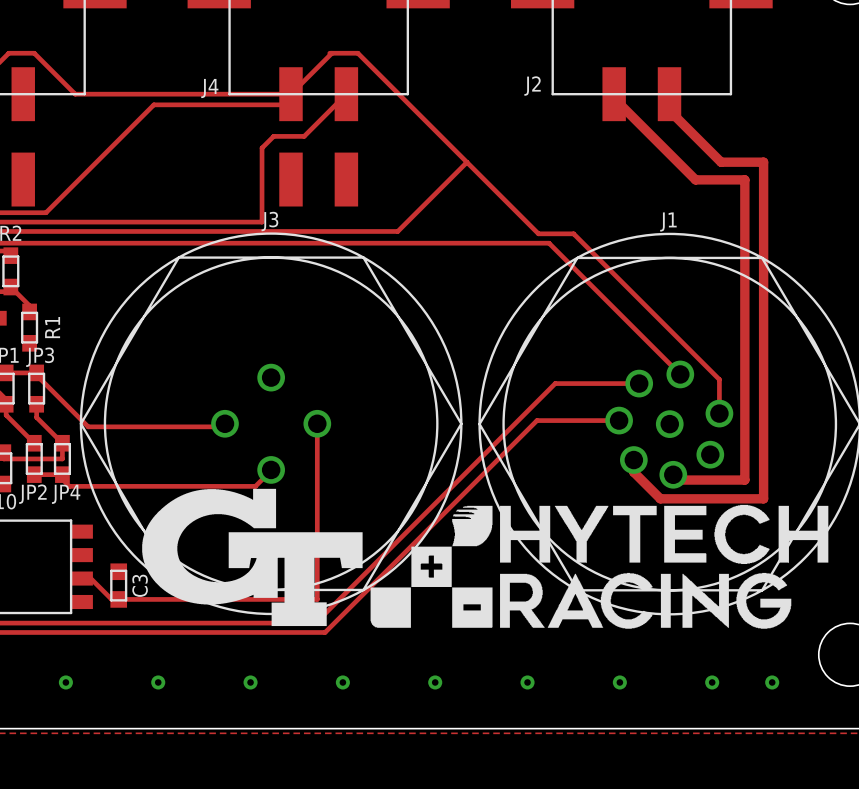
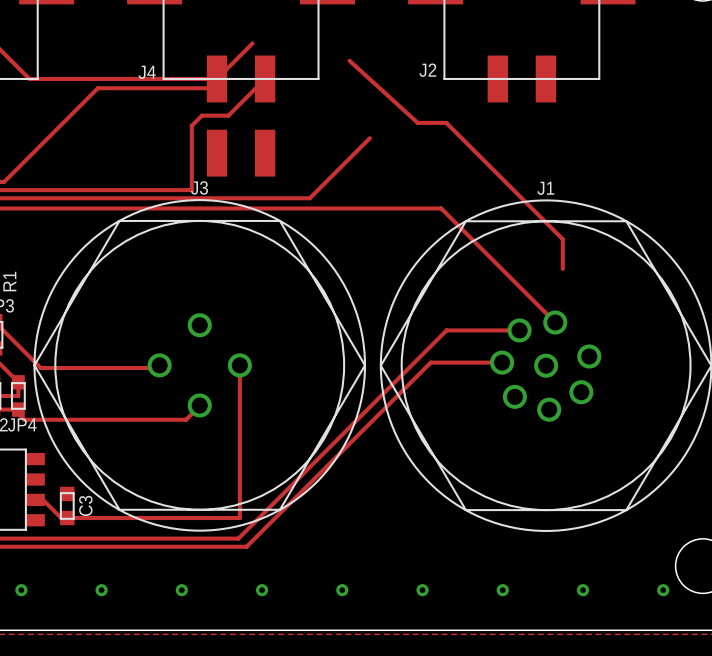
track: (329, 53) (357, 53) (538, 233) (573, 233) (719, 379) (719, 413) -> none
track: none -> (349, 60) (417, 122) (446, 122) (562, 239) (562, 268)
track: (614, 94) (614, 98) (695, 179) (744, 179) (744, 480) (678, 480) (673, 474) -> none
track: (669, 94) (669, 110) (721, 162) (763, 162) (763, 498) (660, 498) (633, 472) (633, 460) -> none
drawing: [142, 488, 829, 629] -> none
via position: (772, 682) -> (663, 590)

